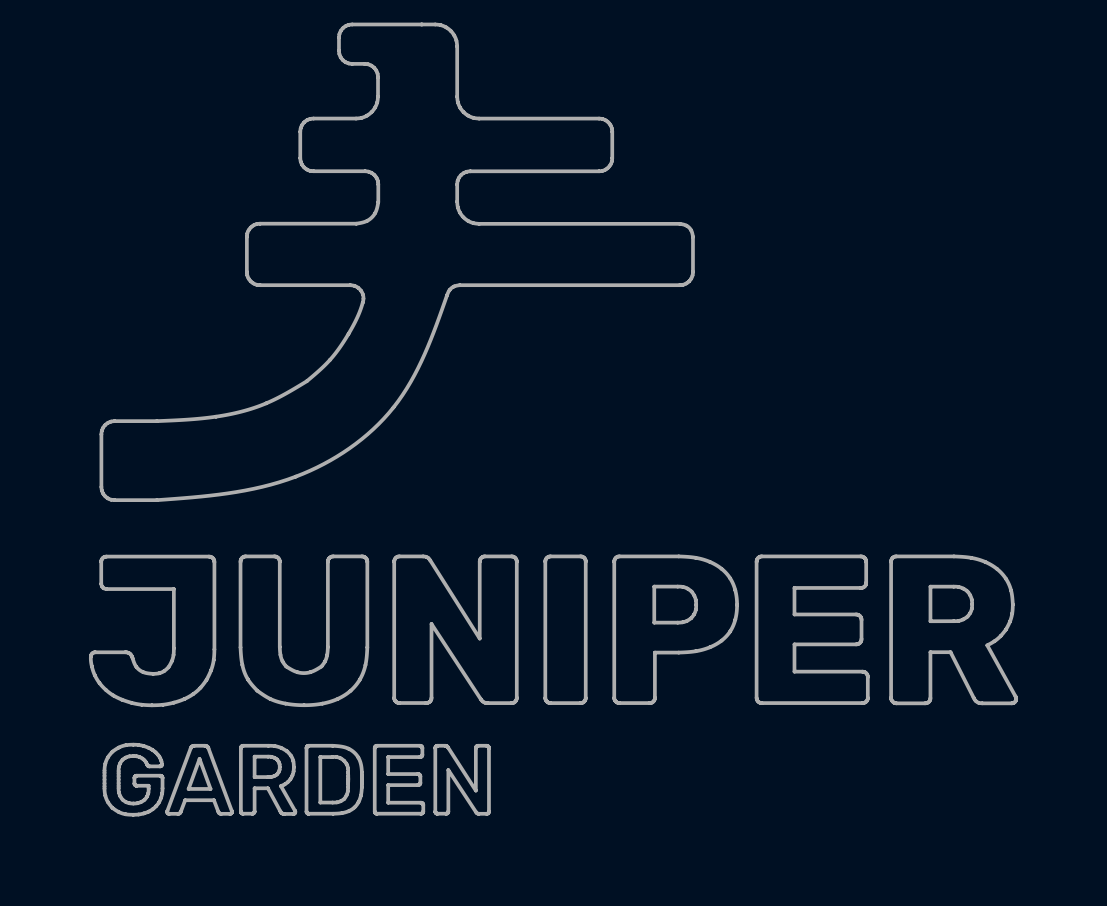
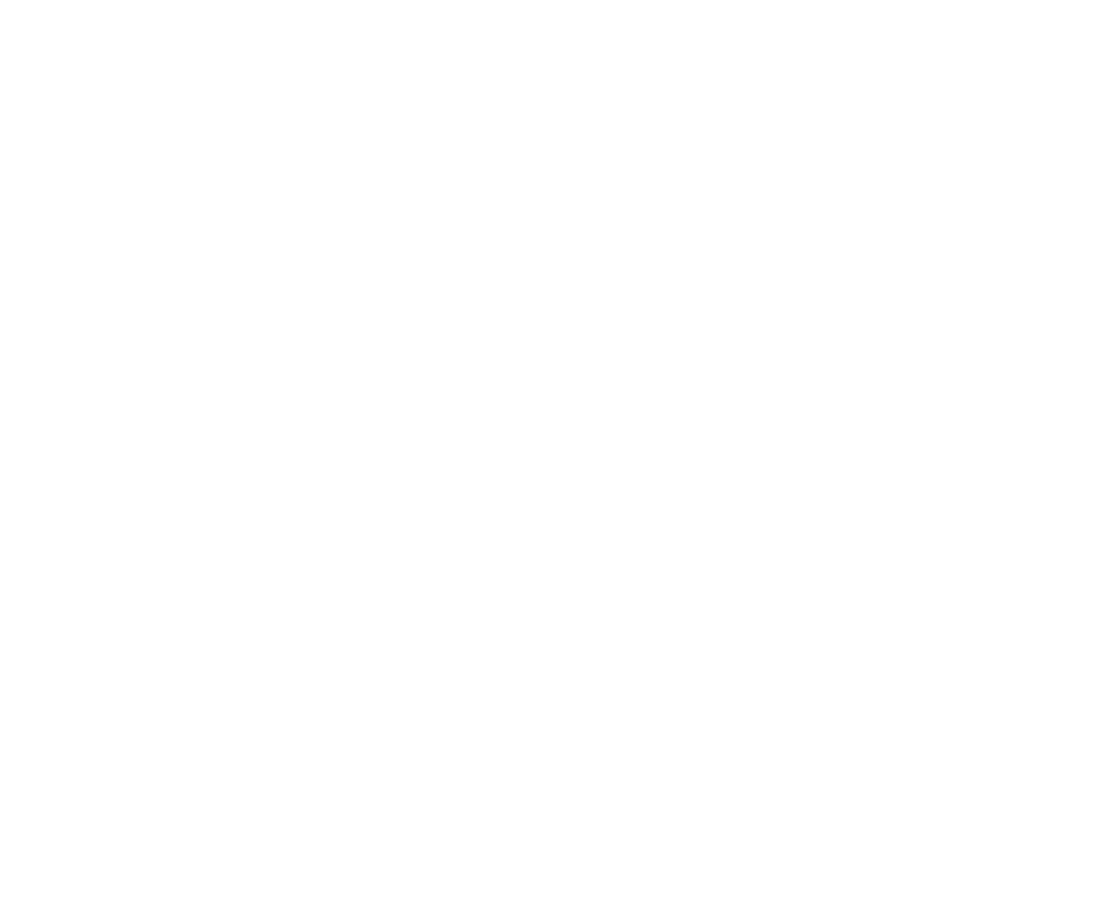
line: (352, 24) (435, 24) (448, 29) (454, 35) (456, 43) (457, 102) (462, 111) (471, 117) (599, 118) (605, 120) (610, 125) (612, 160) (609, 166) (603, 170) (470, 171) (463, 173) (457, 181) (457, 201) (459, 211) (465, 219) (479, 223) (683, 224) (690, 228) (692, 236) (691, 278) (686, 283) (679, 285) (454, 286) (448, 292) (424, 354) (402, 395) (373, 429) (336, 456) (295, 476) (244, 490) (156, 500) (108, 498) (103, 493) (101, 487) (101, 433) (106, 423) (114, 421) (156, 421) (208, 417) (238, 412) (263, 404) (301, 384) (318, 370) (337, 350) (354, 322) (363, 298) (361, 291) (355, 286) (258, 284) (250, 280) (246, 271) (247, 234) (254, 224) (356, 223) (368, 220) (375, 211) (378, 202) (378, 183) (372, 173) (365, 171) (310, 170) (303, 166) (300, 159) (300, 129) (305, 121) (313, 118) (361, 117) (370, 112) (376, 104) (378, 77) (375, 69) (368, 64) (347, 62) (339, 54) (339, 32) (344, 26) (352, 24) -> none
line: (105, 556) (208, 556) (213, 559) (213, 661) (206, 679) (191, 695) (166, 704) (137, 704) (113, 695) (97, 679) (91, 662) (91, 655) (93, 652) (128, 652) (138, 669) (153, 673) (161, 672) (168, 667) (173, 652) (173, 589) (104, 588) (101, 583) (101, 561) (105, 556) -> none
line: (244, 556) (274, 556) (279, 559) (280, 656) (286, 666) (295, 671) (303, 673) (312, 671) (321, 666) (327, 655) (328, 559) (333, 556) (362, 556) (366, 558) (366, 659) (360, 678) (348, 692) (324, 703) (292, 704) (269, 698) (257, 690) (250, 682) (243, 667) (240, 647) (240, 561) (244, 556) -> none
line: (398, 556) (394, 561) (395, 700) (399, 703) (426, 703) (431, 700) (431, 624) (482, 701) (487, 703) (514, 702) (516, 697) (515, 558) (511, 556) (484, 556) (480, 559) (479, 638) (428, 558) (423, 556) (398, 556) -> none
line: (549, 556) (581, 556) (585, 560) (585, 697) (581, 702) (549, 703) (545, 699) (545, 561) (549, 556) -> none
line: (618, 556) (614, 561) (614, 699) (618, 703) (651, 702) (654, 698) (654, 652) (696, 651) (720, 641) (729, 632) (734, 621) (737, 606) (735, 592) (731, 581) (725, 572) (715, 564) (703, 559) (678, 556) (618, 556) -> none
line: (760, 556) (860, 556) (865, 558) (866, 583) (863, 587) (794, 587) (794, 614) (856, 614) (861, 619) (861, 640) (858, 644) (794, 644) (794, 671) (864, 672) (867, 677) (867, 698) (865, 702) (761, 703) (757, 700) (756, 561) (760, 556) -> none
line: (894, 556) (971, 557) (990, 564) (1003, 575) (1011, 592) (1011, 615) (1002, 633) (987, 645) (1015, 696) (1014, 702) (982, 703) (976, 701) (950, 652) (930, 652) (930, 698) (928, 702) (896, 703) (892, 701) (891, 561) (894, 556) -> none
line: (654, 586) (654, 622) (682, 622) (692, 616) (695, 610) (696, 601) (689, 590) (681, 586) (654, 586) -> none
line: (930, 586) (957, 586) (965, 590) (971, 600) (969, 614) (958, 620) (930, 621) (930, 586) -> none
line: (133, 744) (122, 746) (112, 751) (106, 759) (104, 769) (104, 791) (107, 801) (117, 811) (129, 814) (142, 813) (152, 809) (159, 801) (162, 790) (161, 775) (136, 775) (134, 777) (135, 785) (148, 785) (145, 798) (139, 802) (132, 803) (125, 801) (120, 797) (118, 790) (118, 768) (123, 759) (136, 756) (143, 759) (148, 766) (161, 764) (159, 757) (153, 750) (143, 746) (133, 744) -> none
line: (194, 745) (208, 747) (231, 810) (230, 813) (219, 813) (213, 800) (185, 800) (179, 813) (167, 812) (190, 748) (194, 745) -> none
line: (308, 745) (342, 746) (350, 749) (357, 756) (361, 768) (361, 790) (358, 801) (352, 809) (338, 813) (306, 812) (306, 748) (308, 745) -> none
line: (377, 745) (421, 746) (420, 756) (388, 757) (388, 774) (418, 774) (420, 776) (418, 785) (388, 785) (388, 802) (421, 802) (422, 813) (375, 812) (374, 748) (377, 745) -> none
line: (437, 745) (447, 746) (475, 790) (475, 747) (478, 745) (488, 746) (488, 813) (476, 812) (448, 770) (448, 812) (435, 812) (435, 748) (437, 745) -> none
line: (254, 756) (254, 777) (271, 776) (278, 773) (279, 764) (276, 758) (254, 756) -> none
line: (320, 757) (338, 757) (346, 764) (347, 791) (344, 798) (340, 801) (320, 802) (320, 757) -> none
line: (199, 759) (210, 788) (188, 788) (199, 759) -> none
line: (295, 810) (280, 786) (288, 781) (293, 773) (293, 761) (289, 754) (275, 746) (241, 746) (241, 812) (254, 812) (254, 788) (267, 788) (282, 813) (293, 813) (295, 811) -> none

